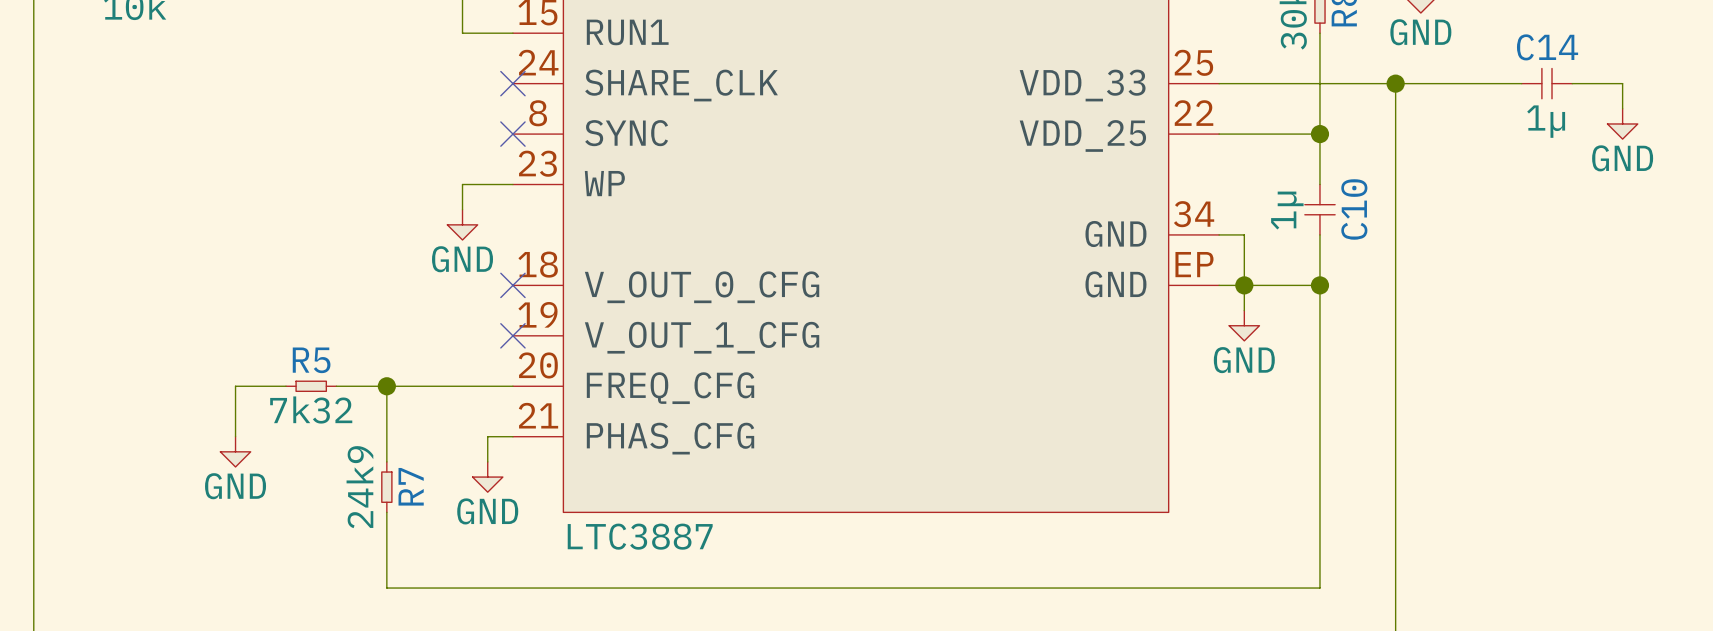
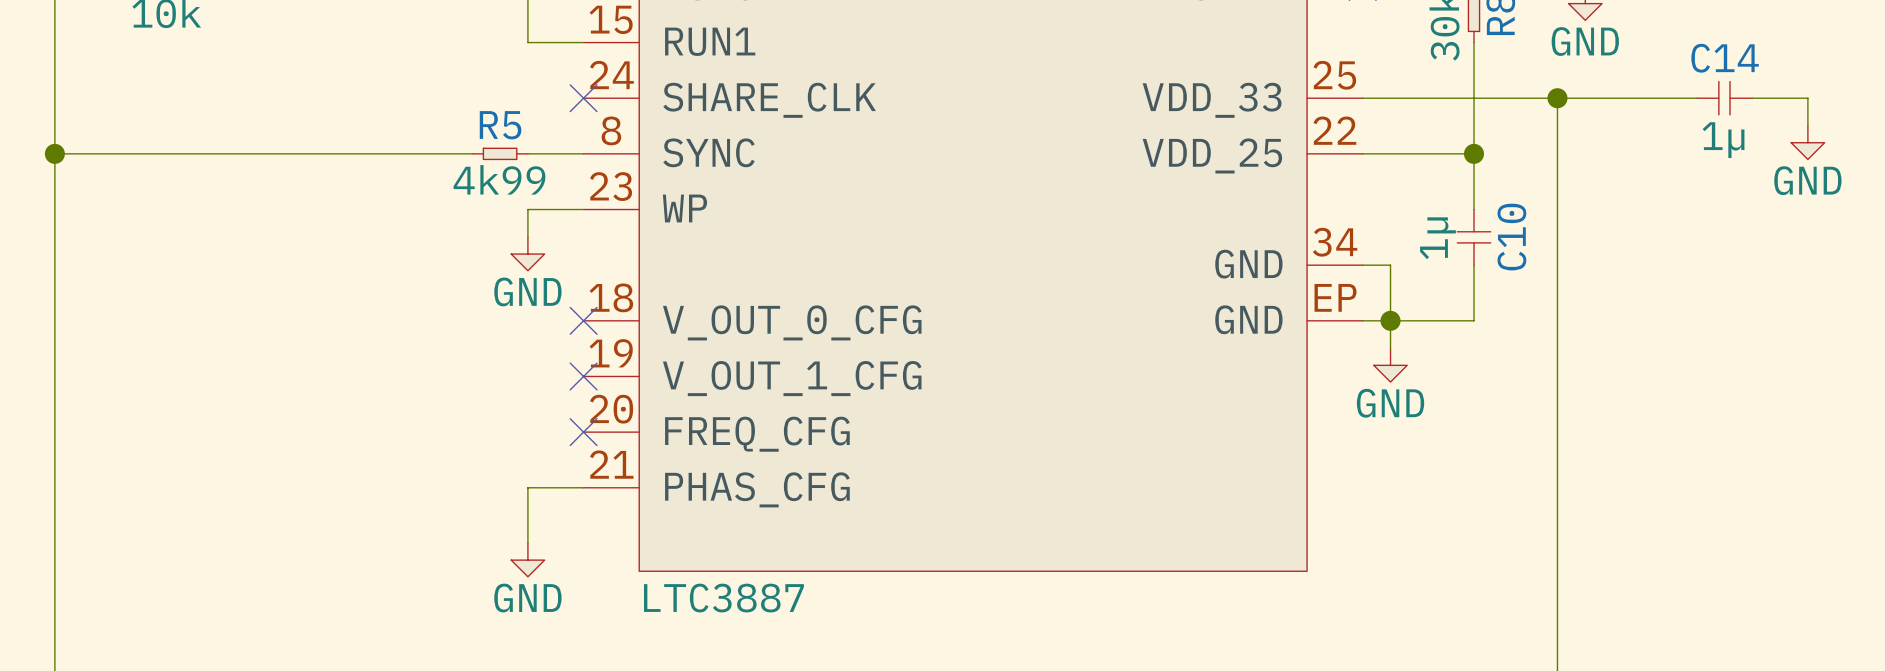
wire: none -> (54, 153) (472, 153)
junction: none -> (54, 153)
wire: none -> (527, 153) (583, 153)
no-connect mark: (512, 134) -> none
wire: (1319, 285) (1319, 588) (386, 588) (386, 512) -> none
junction: (1319, 285) -> none
wire: (285, 386) (235, 386) (235, 436) -> none
R5 position: (311, 386) -> (500, 153)
wire: (336, 386) (512, 386) -> none
wire: (386, 386) (386, 461) -> none
junction: (386, 386) -> none
no-connect mark: none -> (583, 432)
R5 value: 7k32 (311, 410) -> 4k99 (499, 179)
wire: (487, 436) (487, 461) -> (555, 487) (527, 487) (527, 543)
power symbol: GND (235, 451) -> none
power symbol position: GND (487, 477) -> GND (527, 560)
R7: 24k9 (386, 487) -> none

